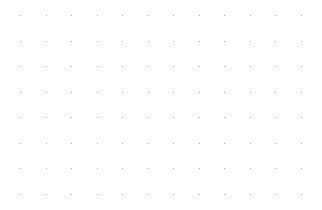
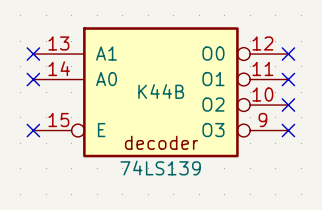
no-connect mark: none -> (33, 54)
no-connect mark: none -> (288, 54)
no-connect mark: none -> (33, 79)
no-connect mark: none -> (288, 79)
K44B: none -> 74LS139 (160, 92)
no-connect mark: none -> (288, 105)
no-connect mark: none -> (33, 130)
no-connect mark: none -> (288, 130)

